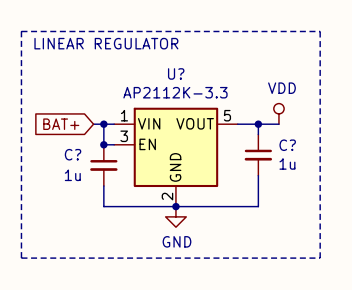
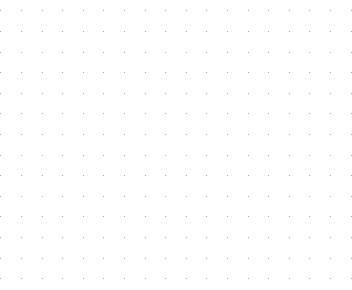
line: (21, 31) (320, 31) (320, 258) (21, 258) (21, 31) -> none
text: LINEAR REGULATOR (106, 43) -> none
power symbol: VDD (278, 113) -> none
global label: BAT+ (61, 124) -> none
wire: (93, 124) (114, 124) -> none
wire: (103, 124) (103, 144) (114, 144) -> none
junction: (103, 124) -> none
wire: (237, 124) (278, 124) -> none
wire: (258, 124) (258, 134) -> none
junction: (258, 124) -> none
junction: (103, 144) -> none
C?: 1u (258, 155) -> none
U?: AP2112K-3.3 (175, 157) -> none
C?: 1u (103, 165) -> none
wire: (258, 175) (258, 206) (103, 206) (103, 186) -> none
junction: (175, 206) -> none
power symbol: GND (175, 216) -> none

